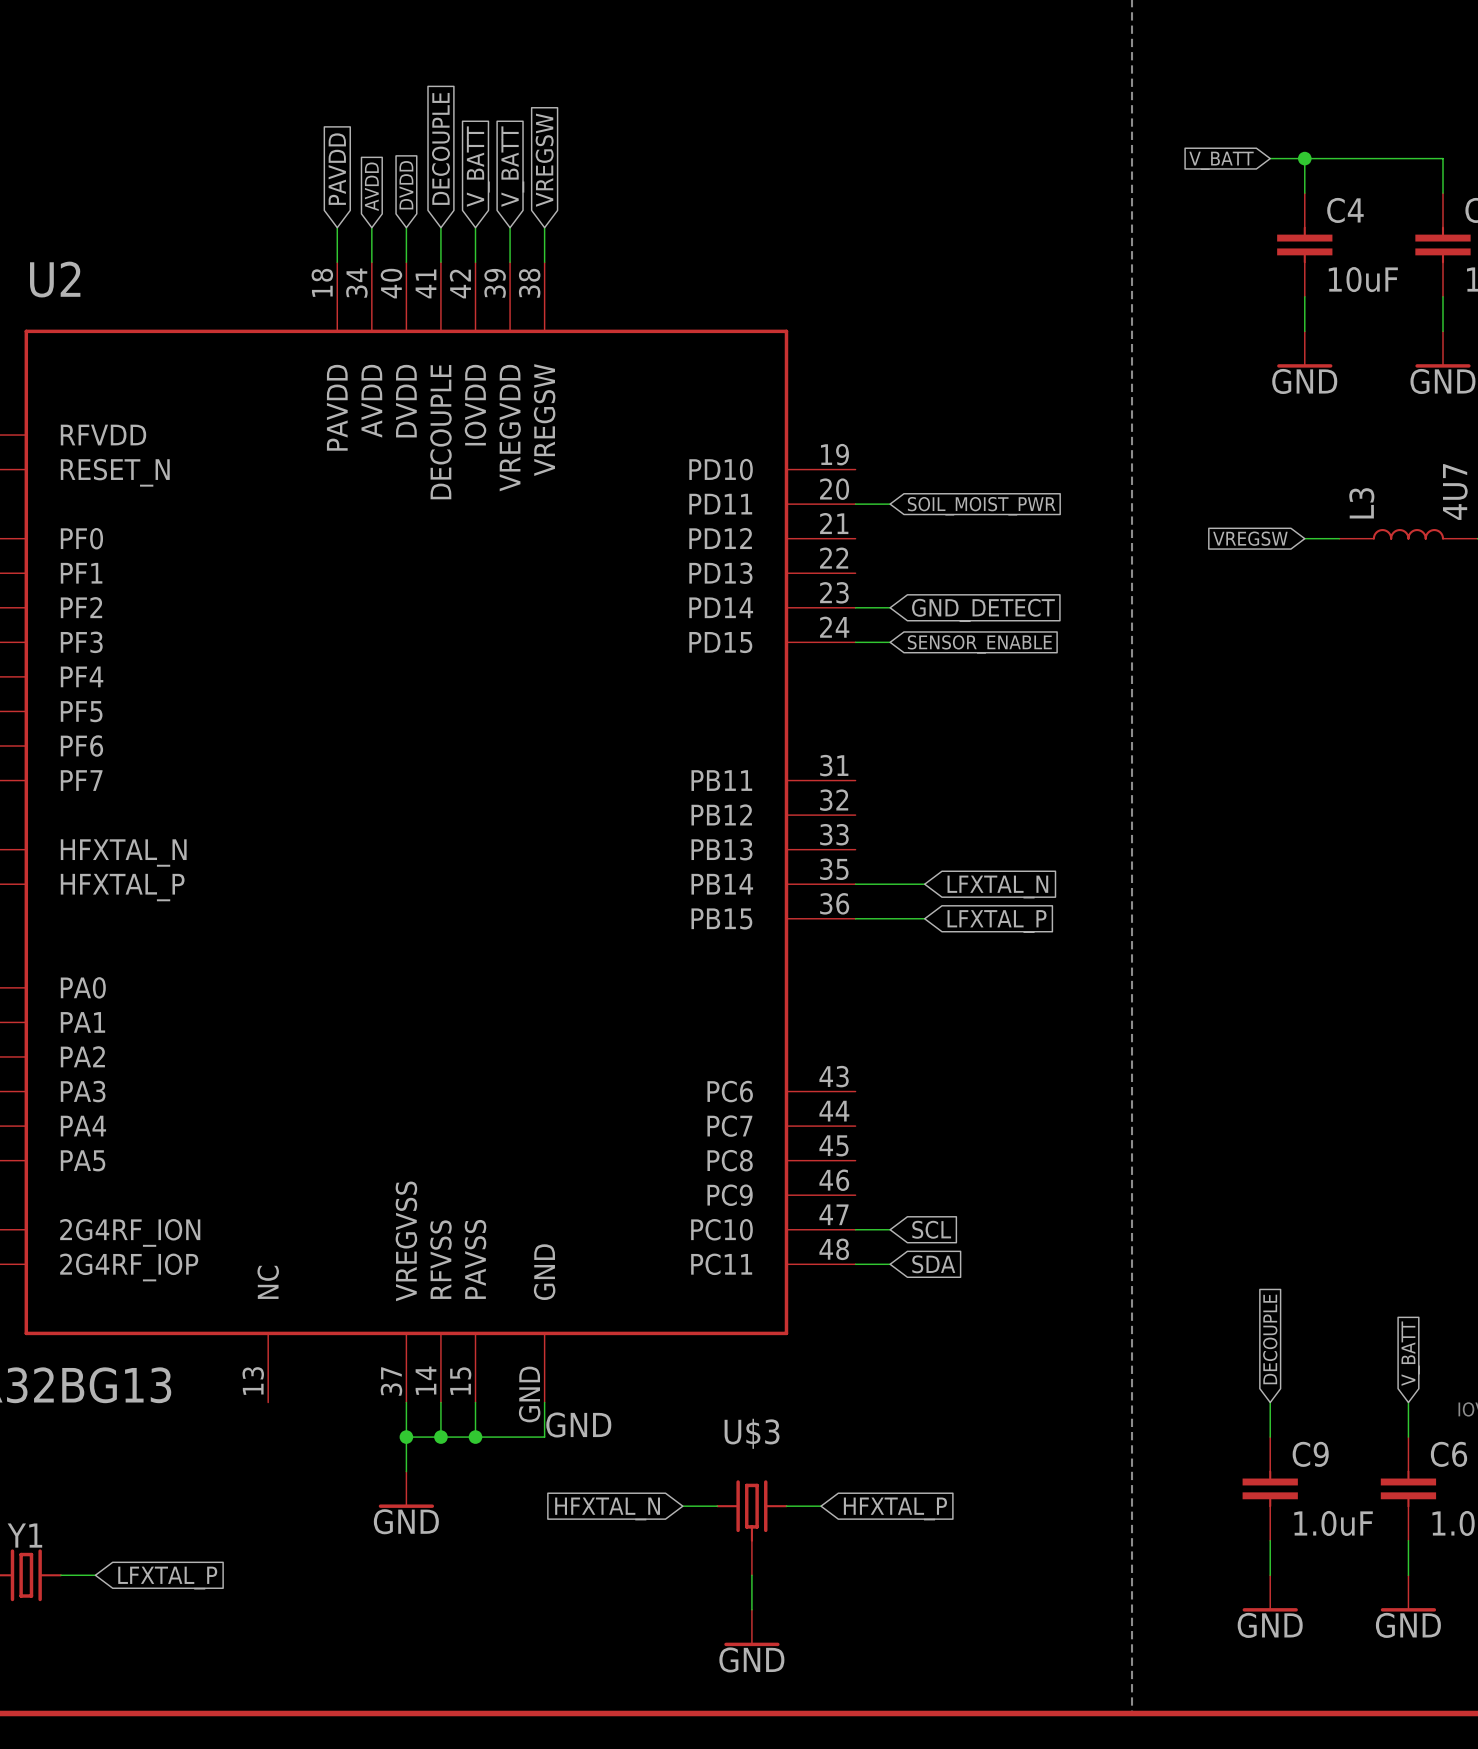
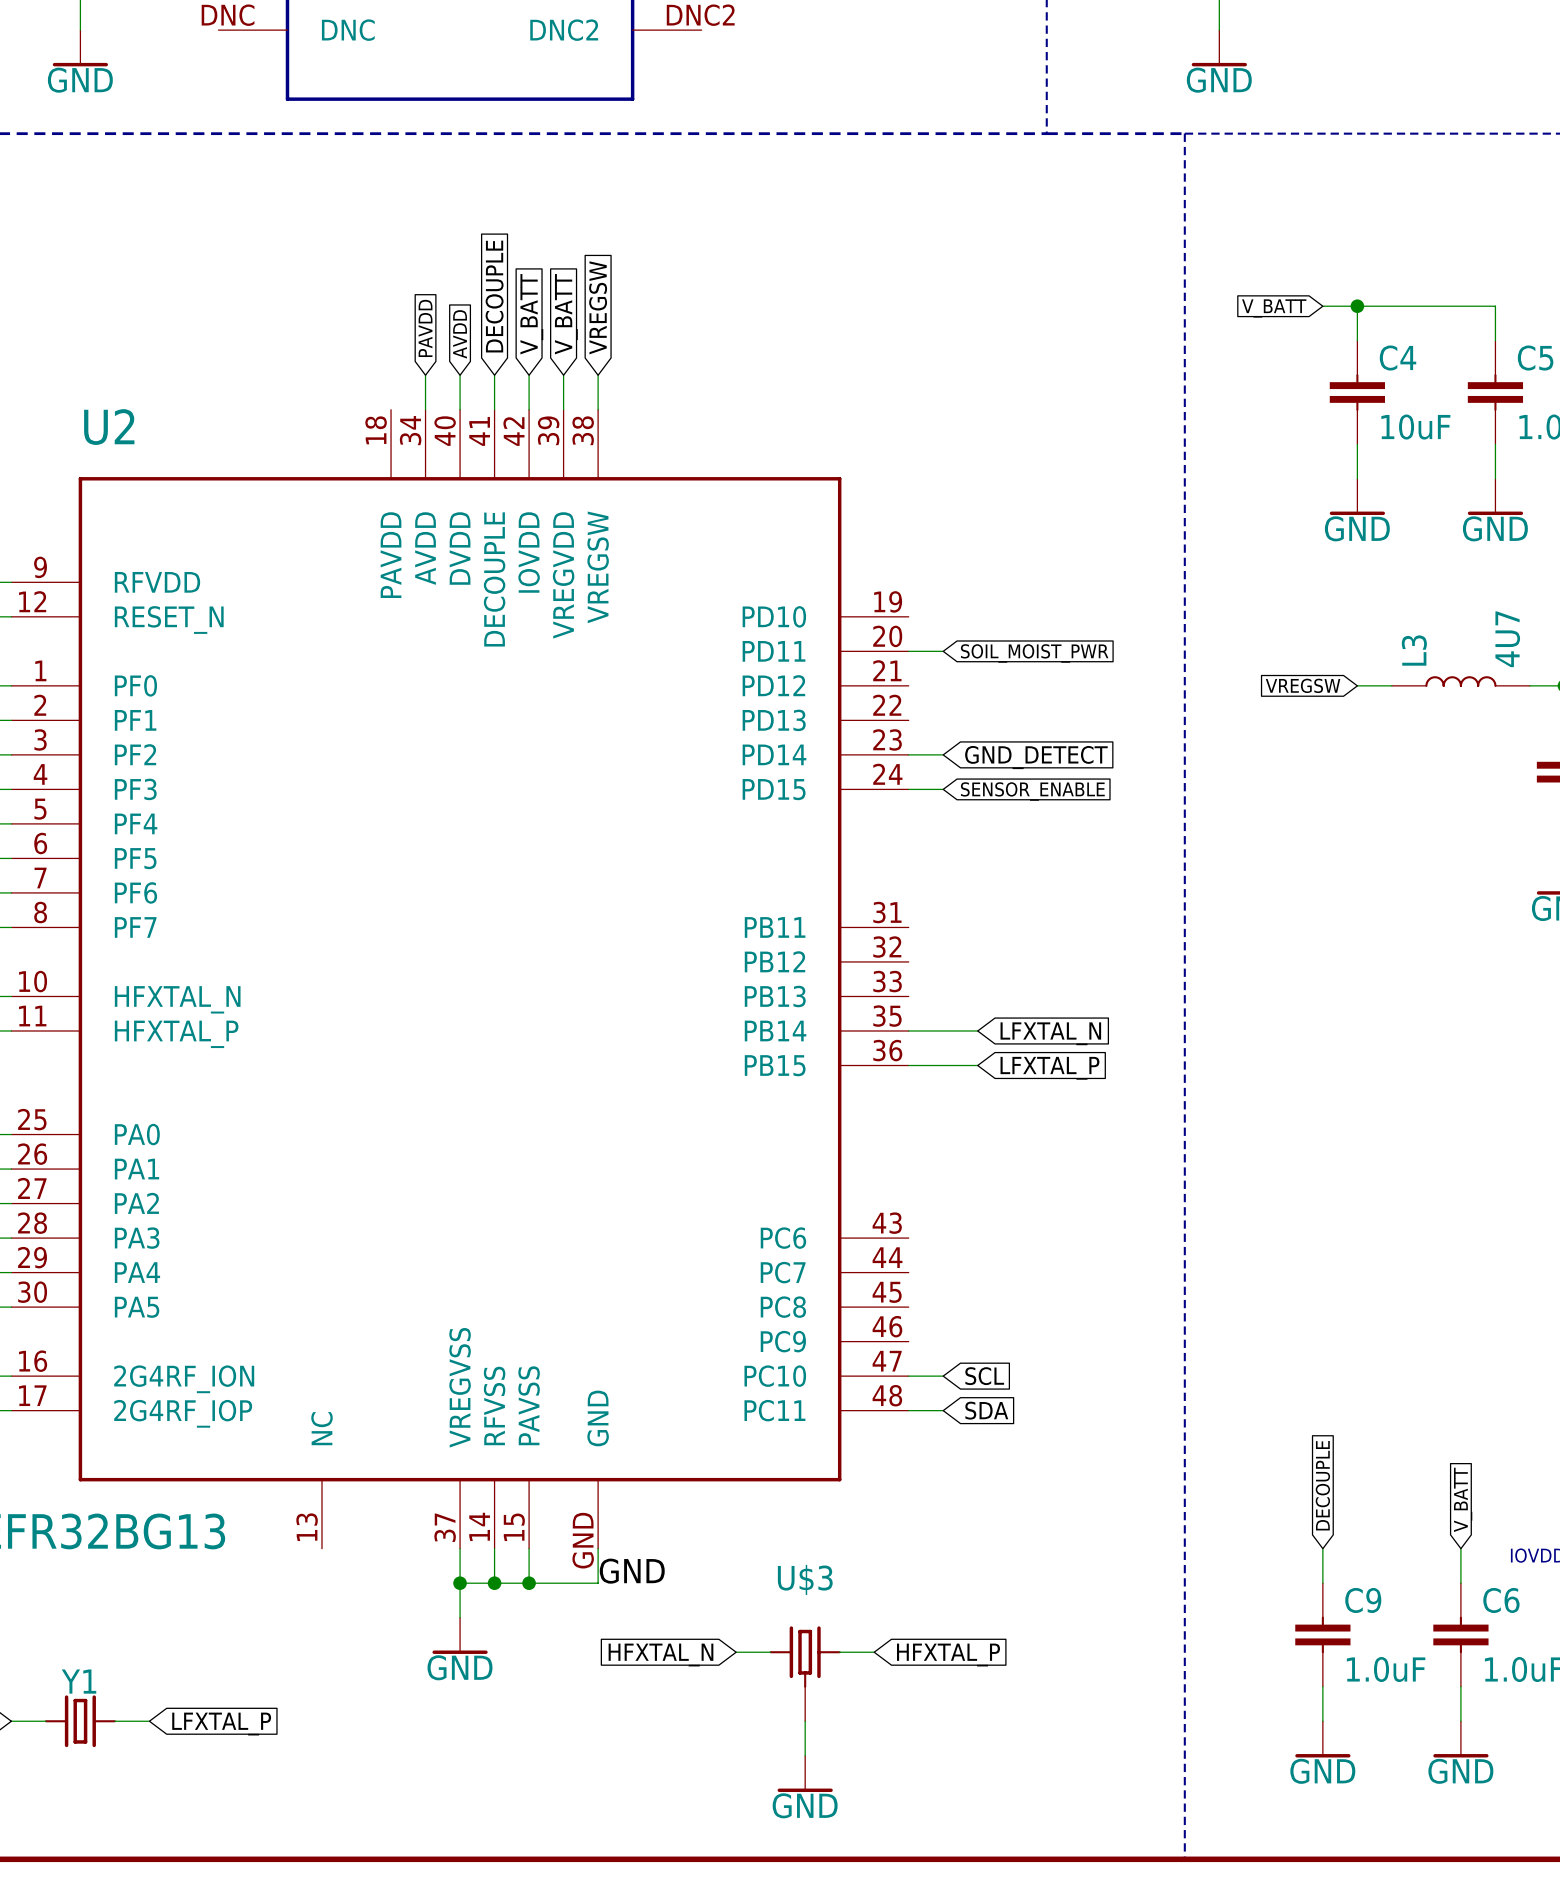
global label: PAVDD (337, 169) -> none
global label: DVDD (406, 185) -> AVDD (460, 334)
global label: AVDD (371, 186) -> PAVDD (425, 328)
wire: (337, 227) (337, 262) -> none

